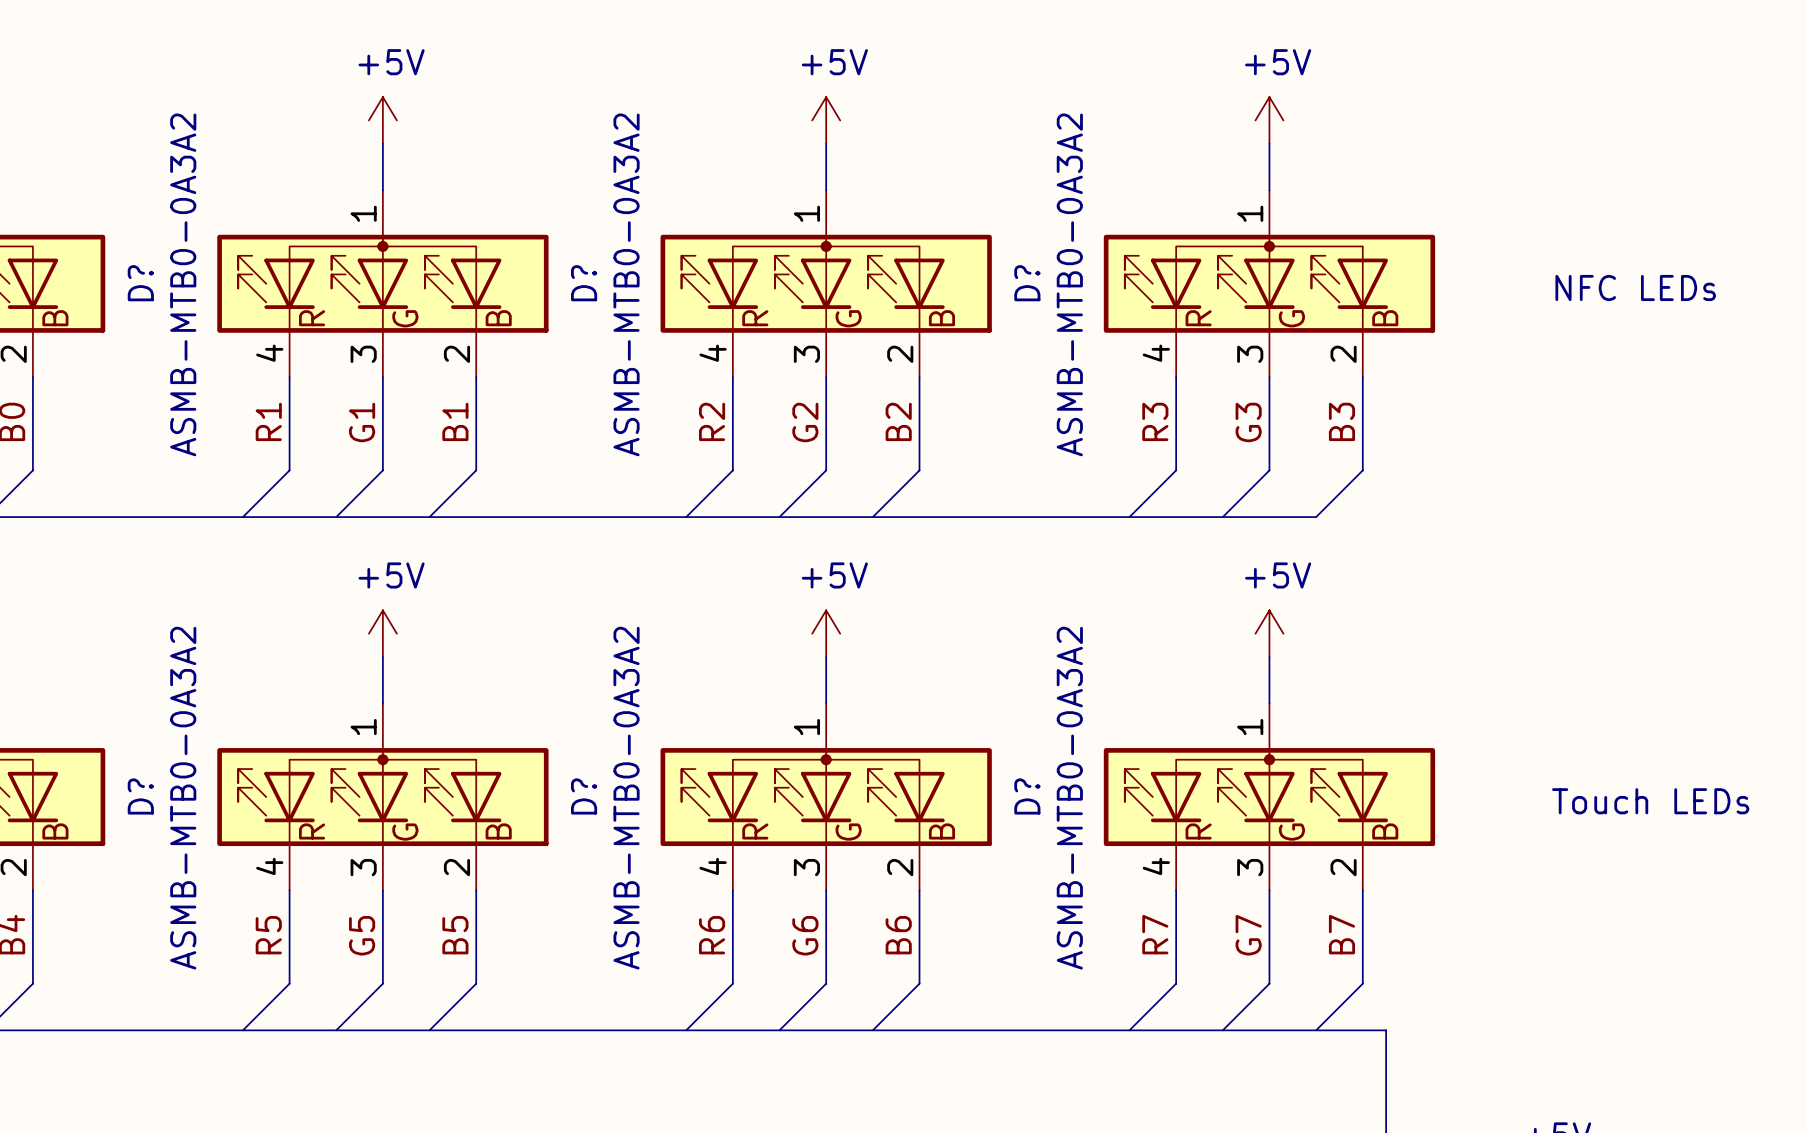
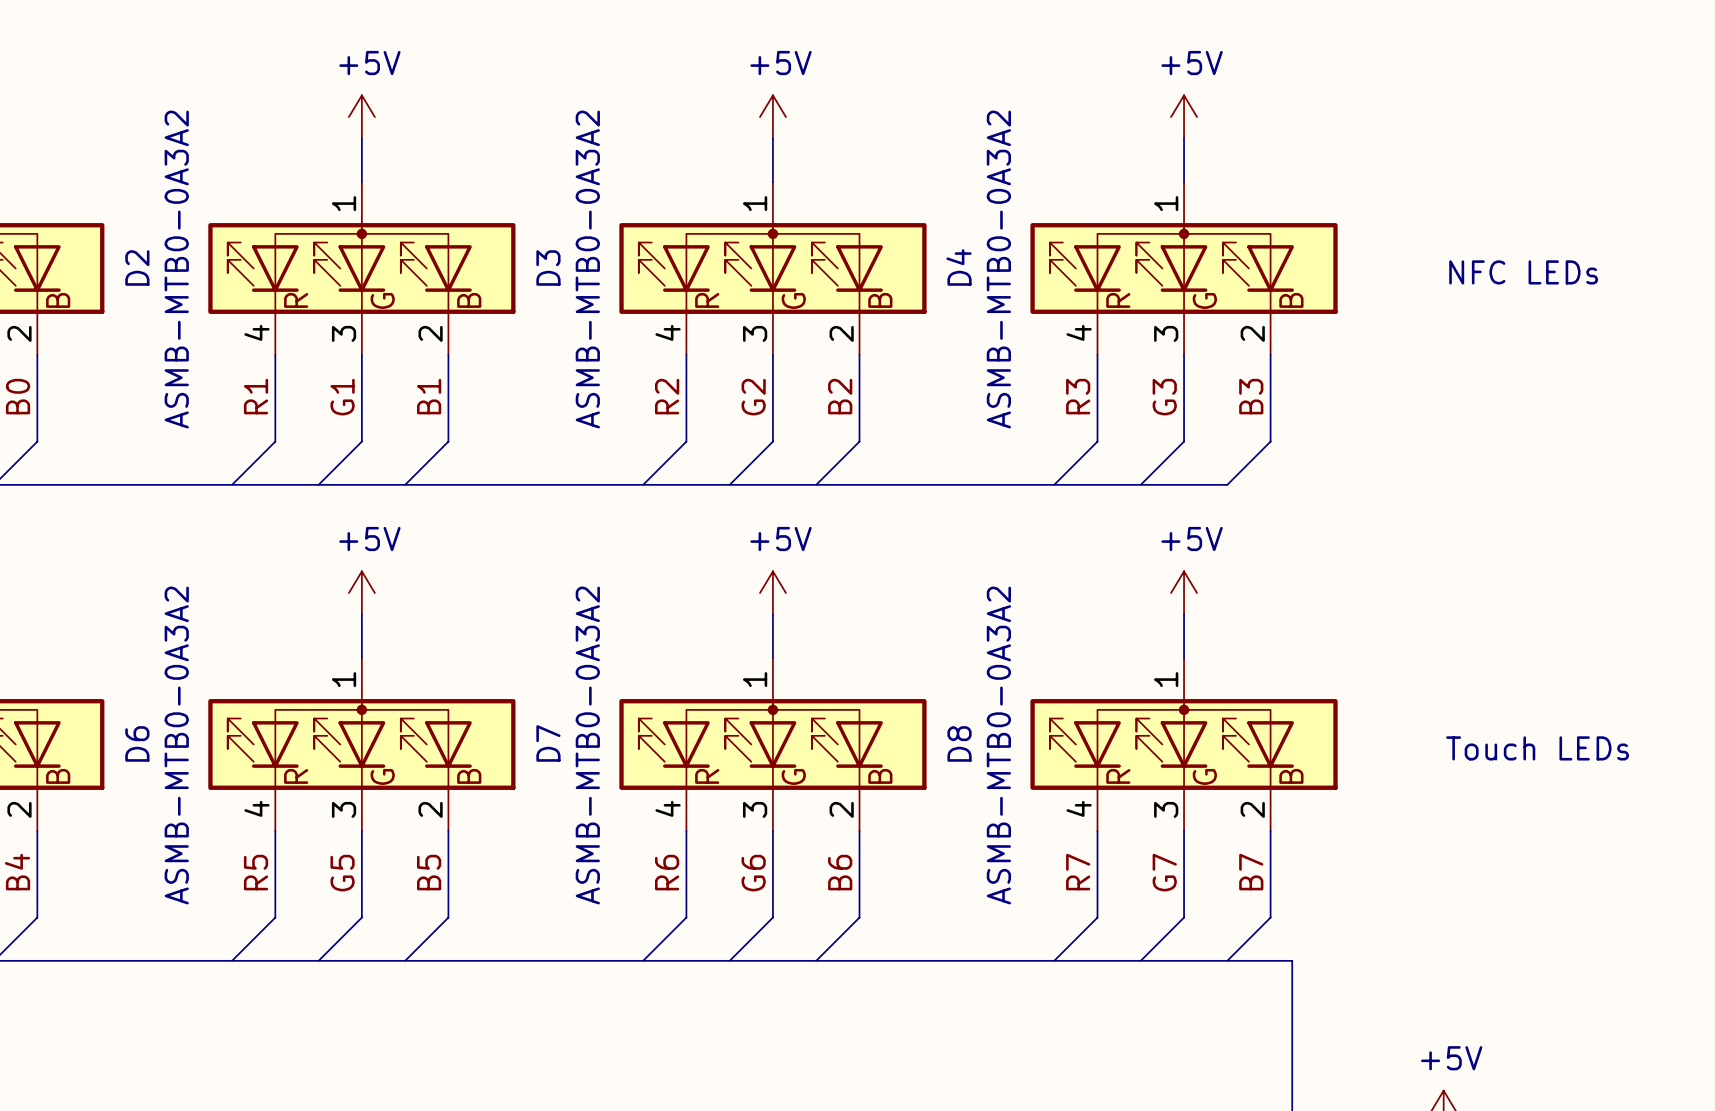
D? name: D? (140, 283) -> D2 (137, 267)
D? name: D? (584, 283) -> D3 (548, 267)
D? name: D? (1027, 283) -> D4 (959, 267)
D? name: D? (140, 796) -> D6 (137, 743)
D? name: D? (584, 796) -> D7 (548, 743)
D? name: D? (1027, 796) -> D8 (959, 743)

